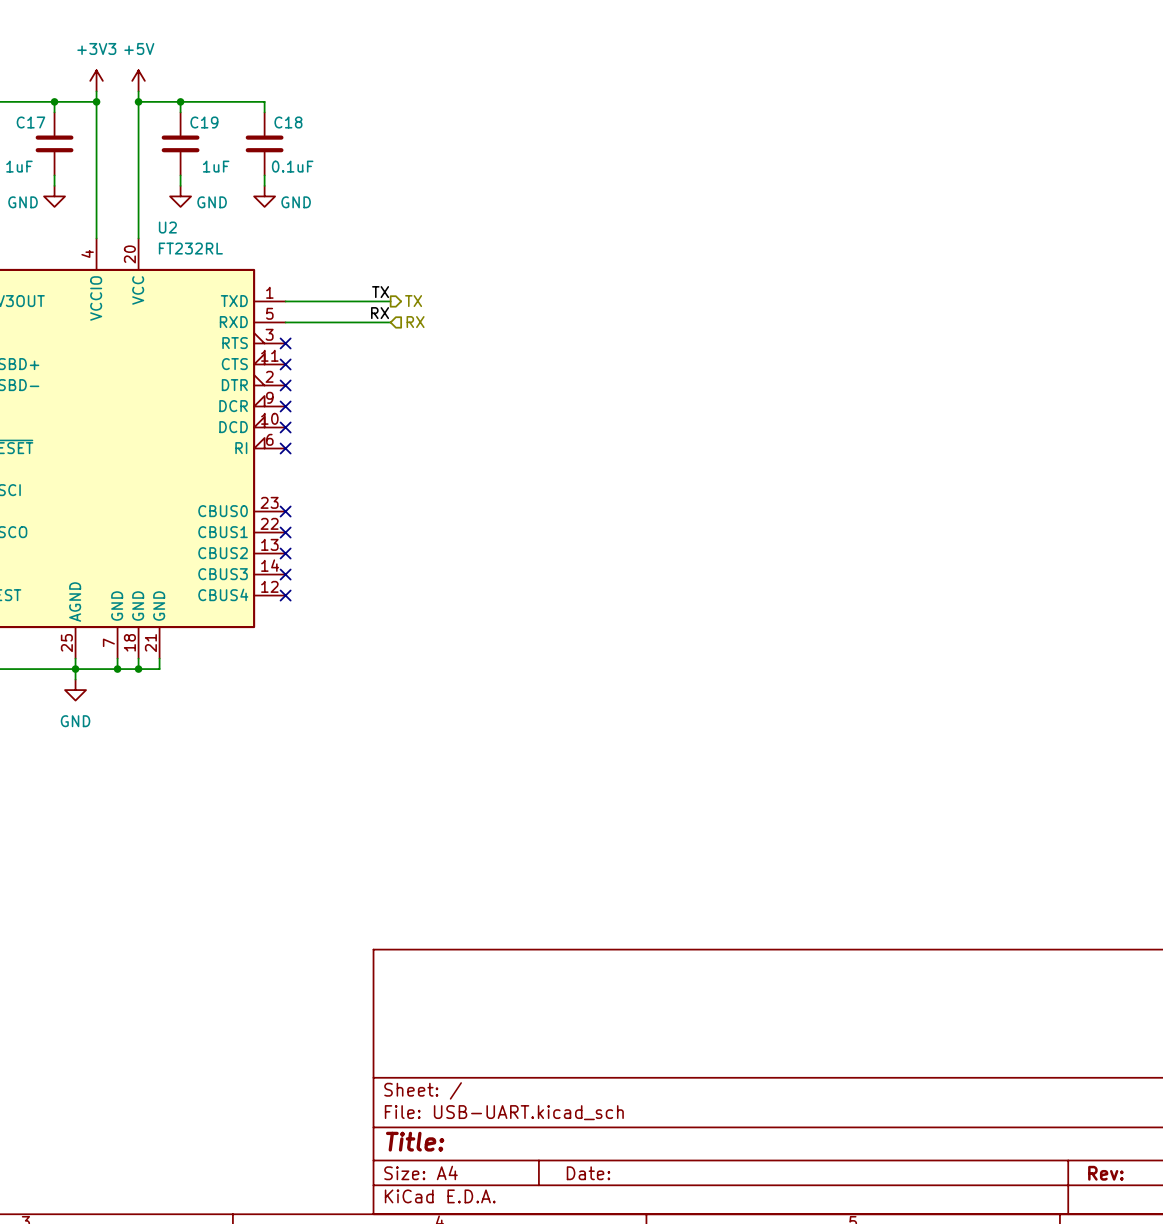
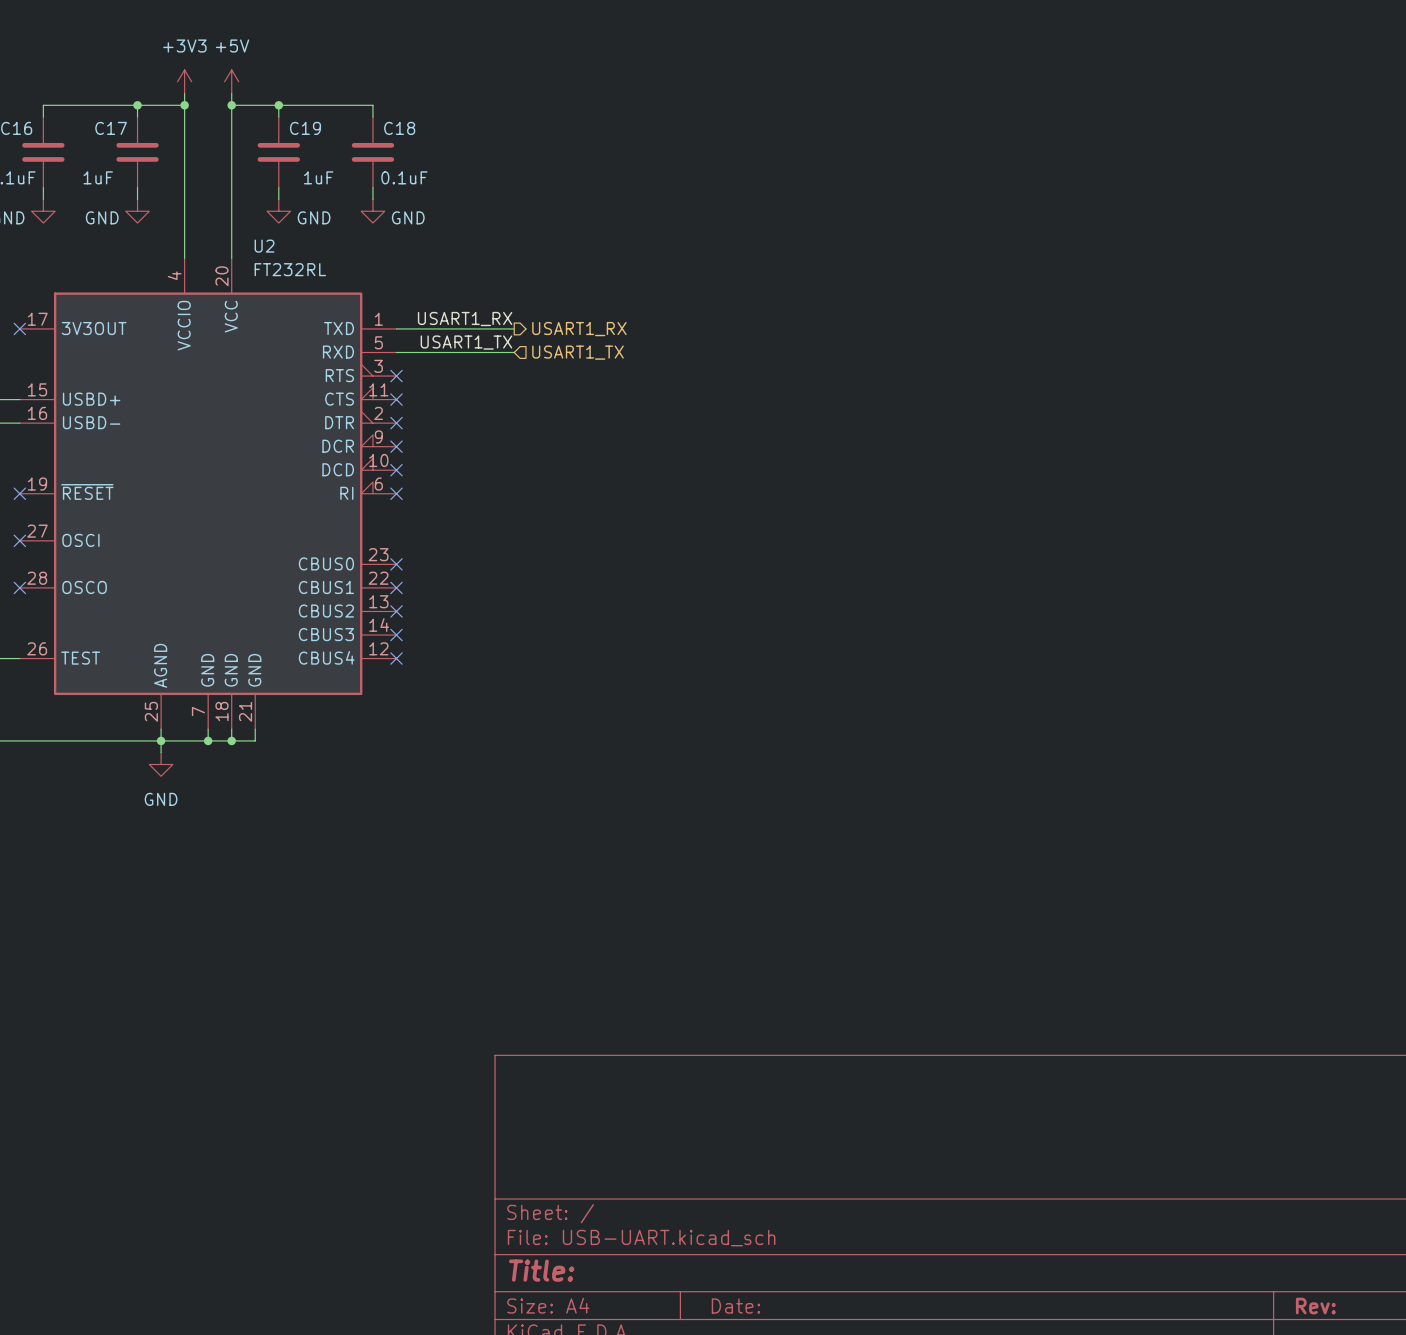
label: TX (380, 292) -> USART1_RX (465, 319)
hierarchical label: TX (413, 301) -> USART1_RX (579, 329)
label: RX (380, 313) -> USART1_TX (466, 342)
hierarchical label: RX (415, 322) -> USART1_TX (578, 352)

